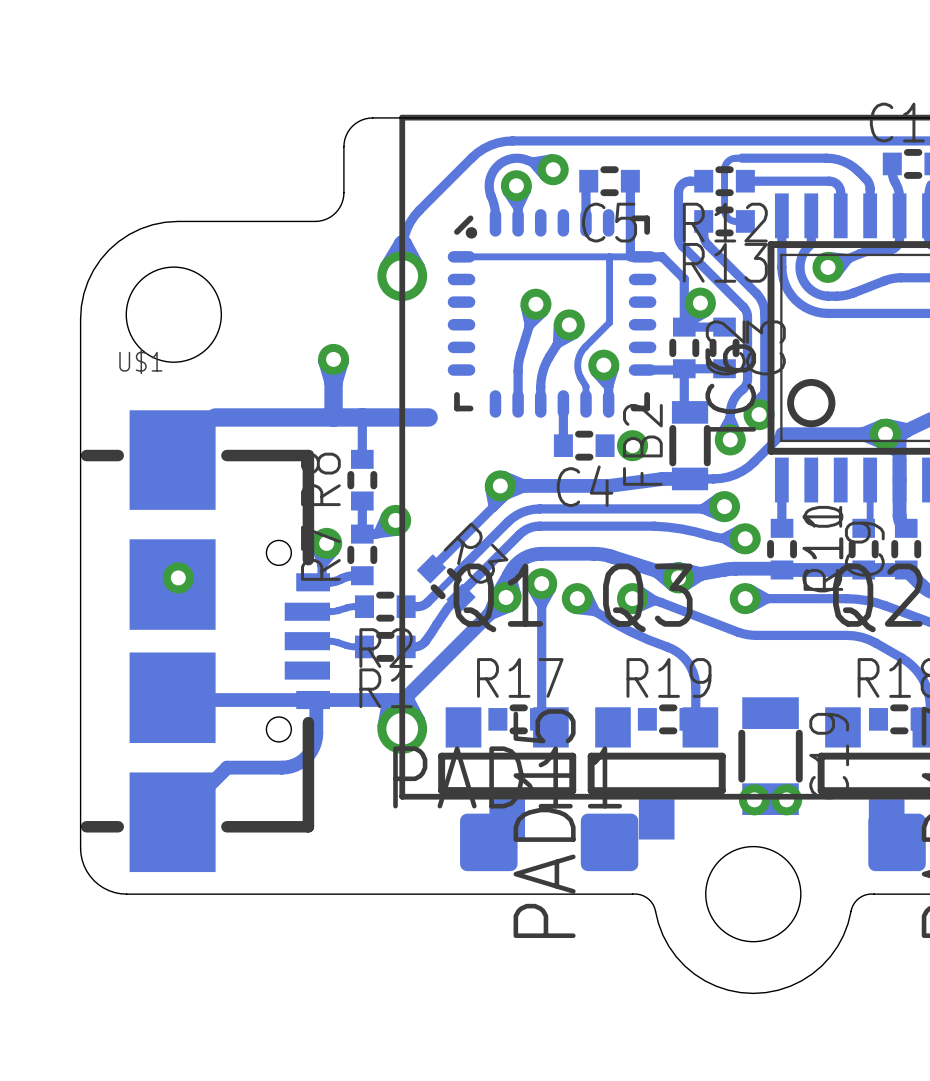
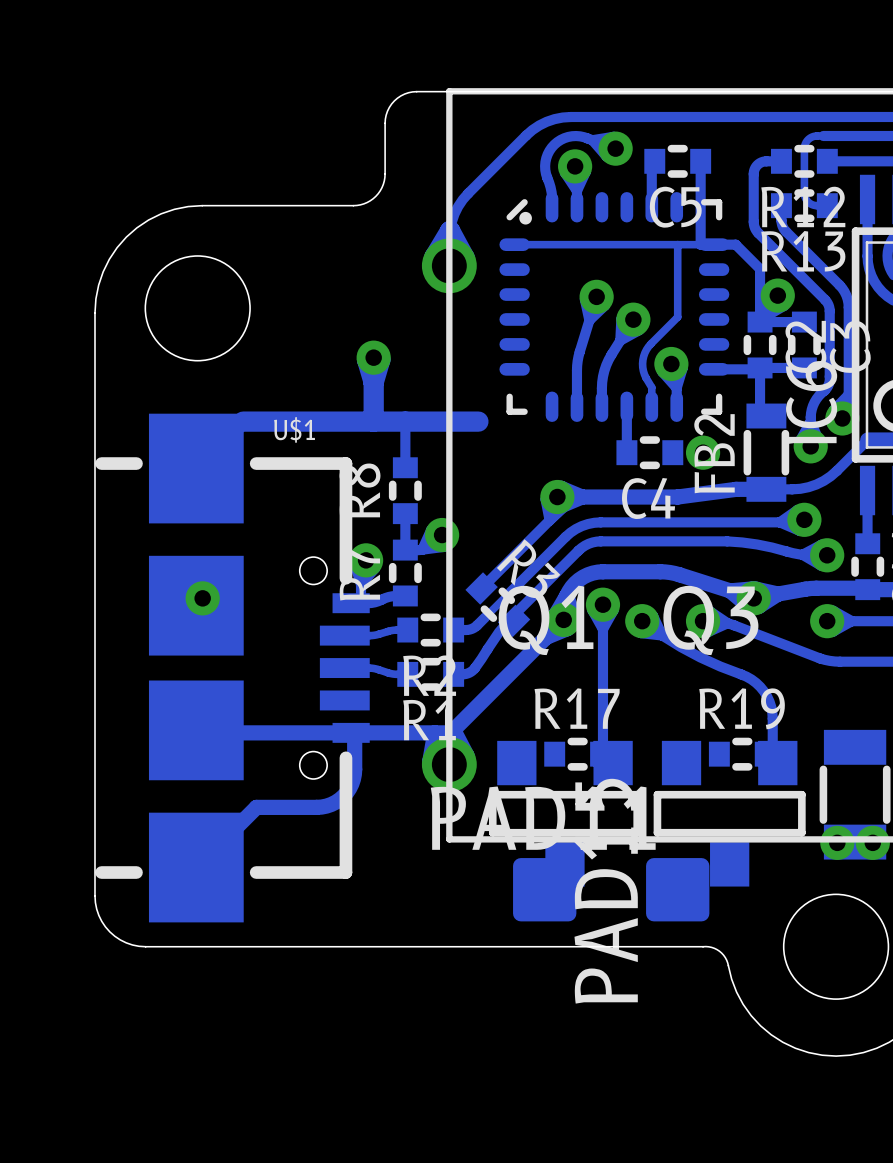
U$1 name position: U$1 (140, 361) -> U$1 (294, 429)

